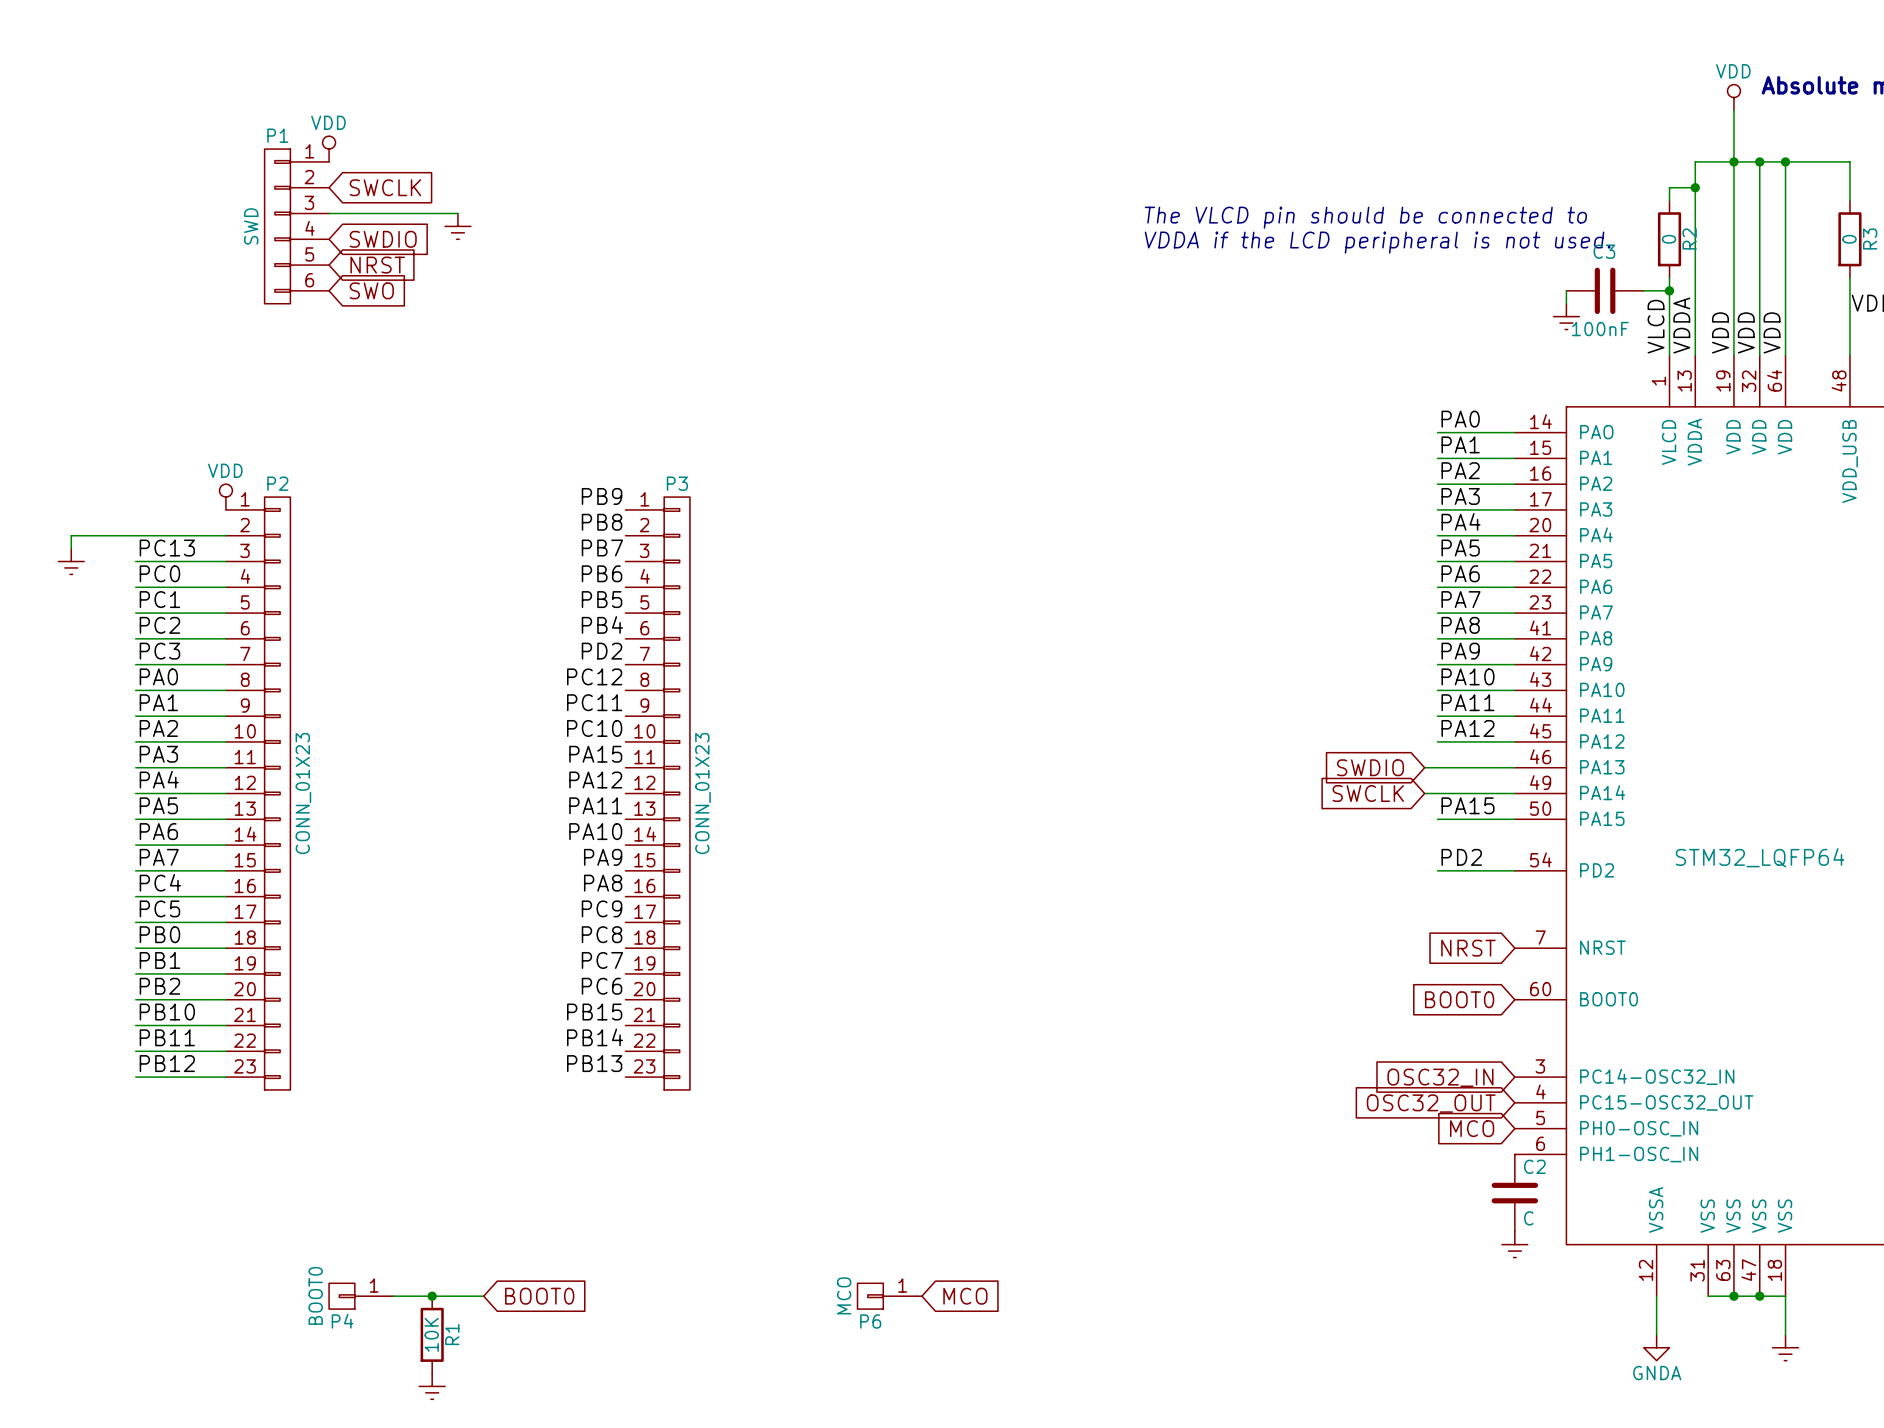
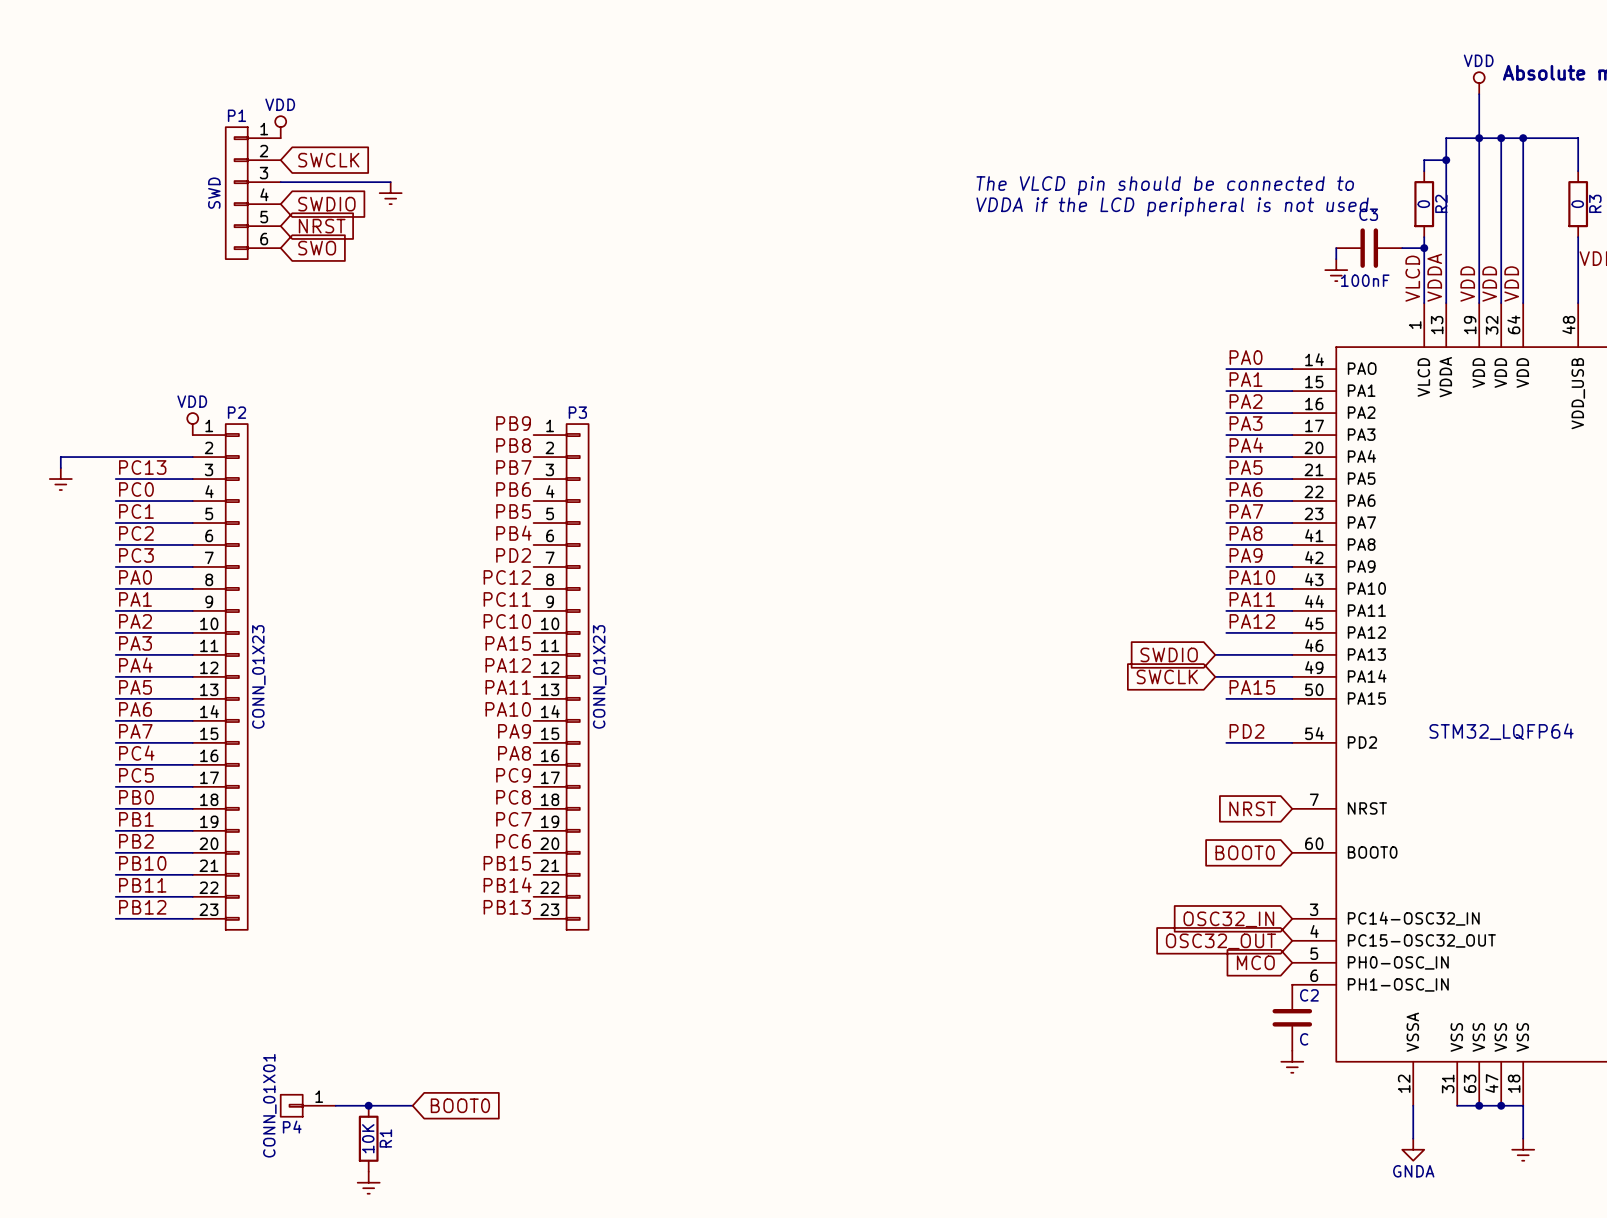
P4 value: BOOT0 (315, 1295) -> CONN_01X01 (269, 1105)
P6: MCO (889, 1296) -> none
global label: MCO (965, 1296) -> none

